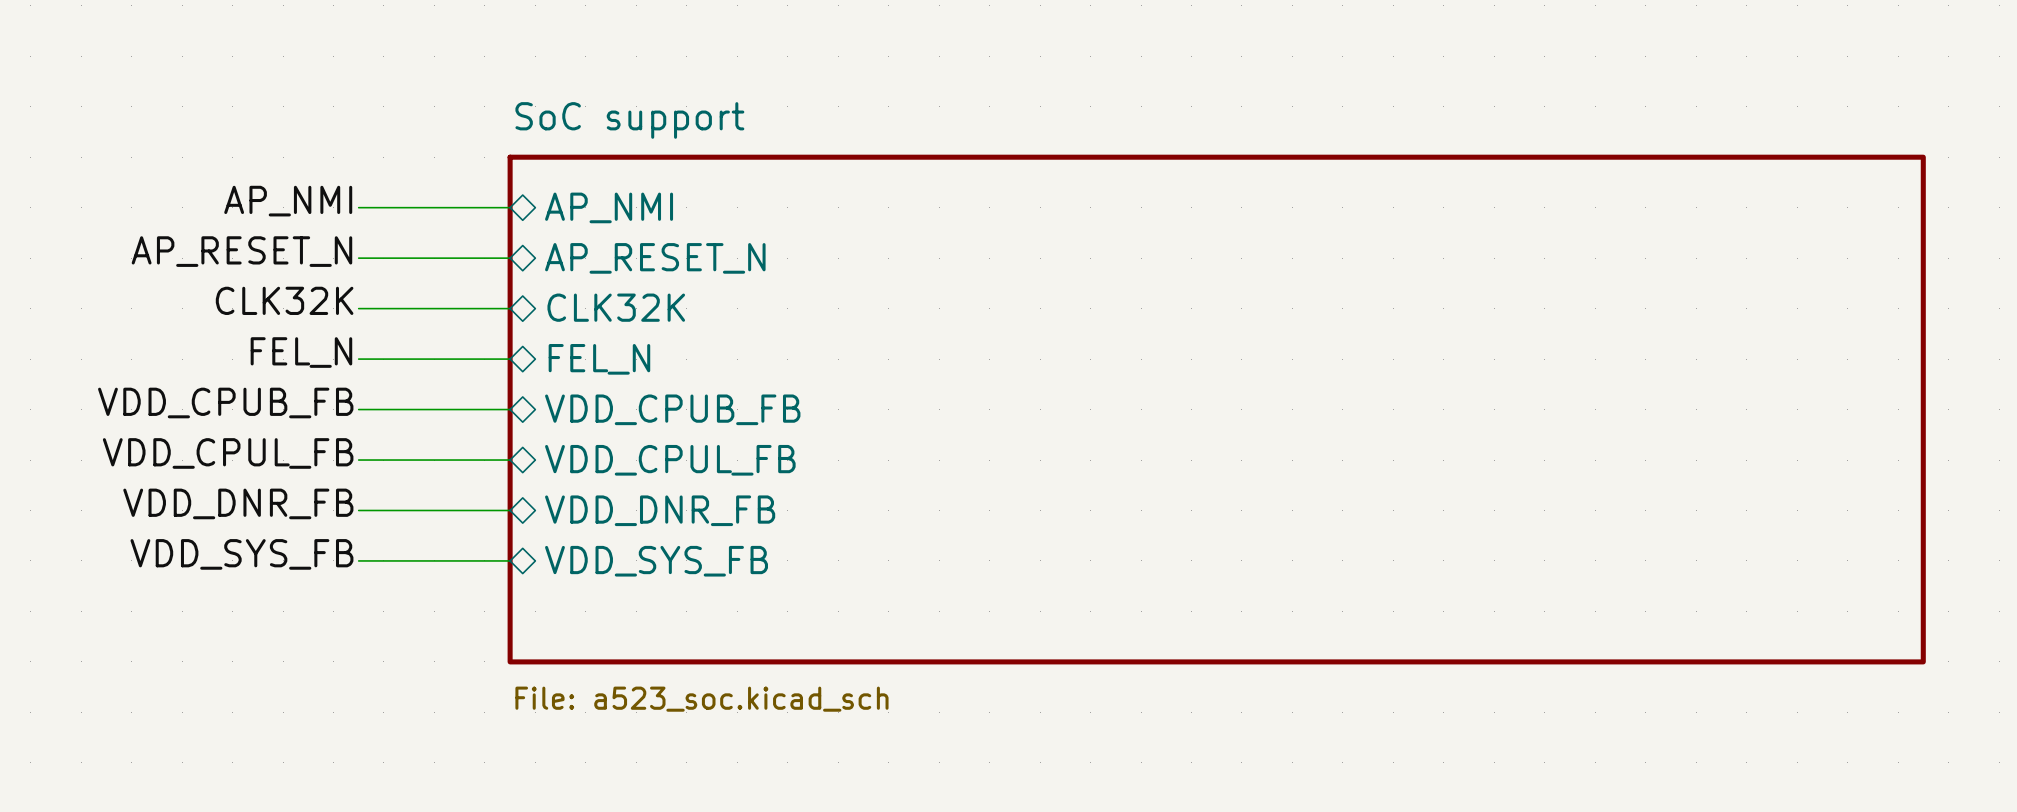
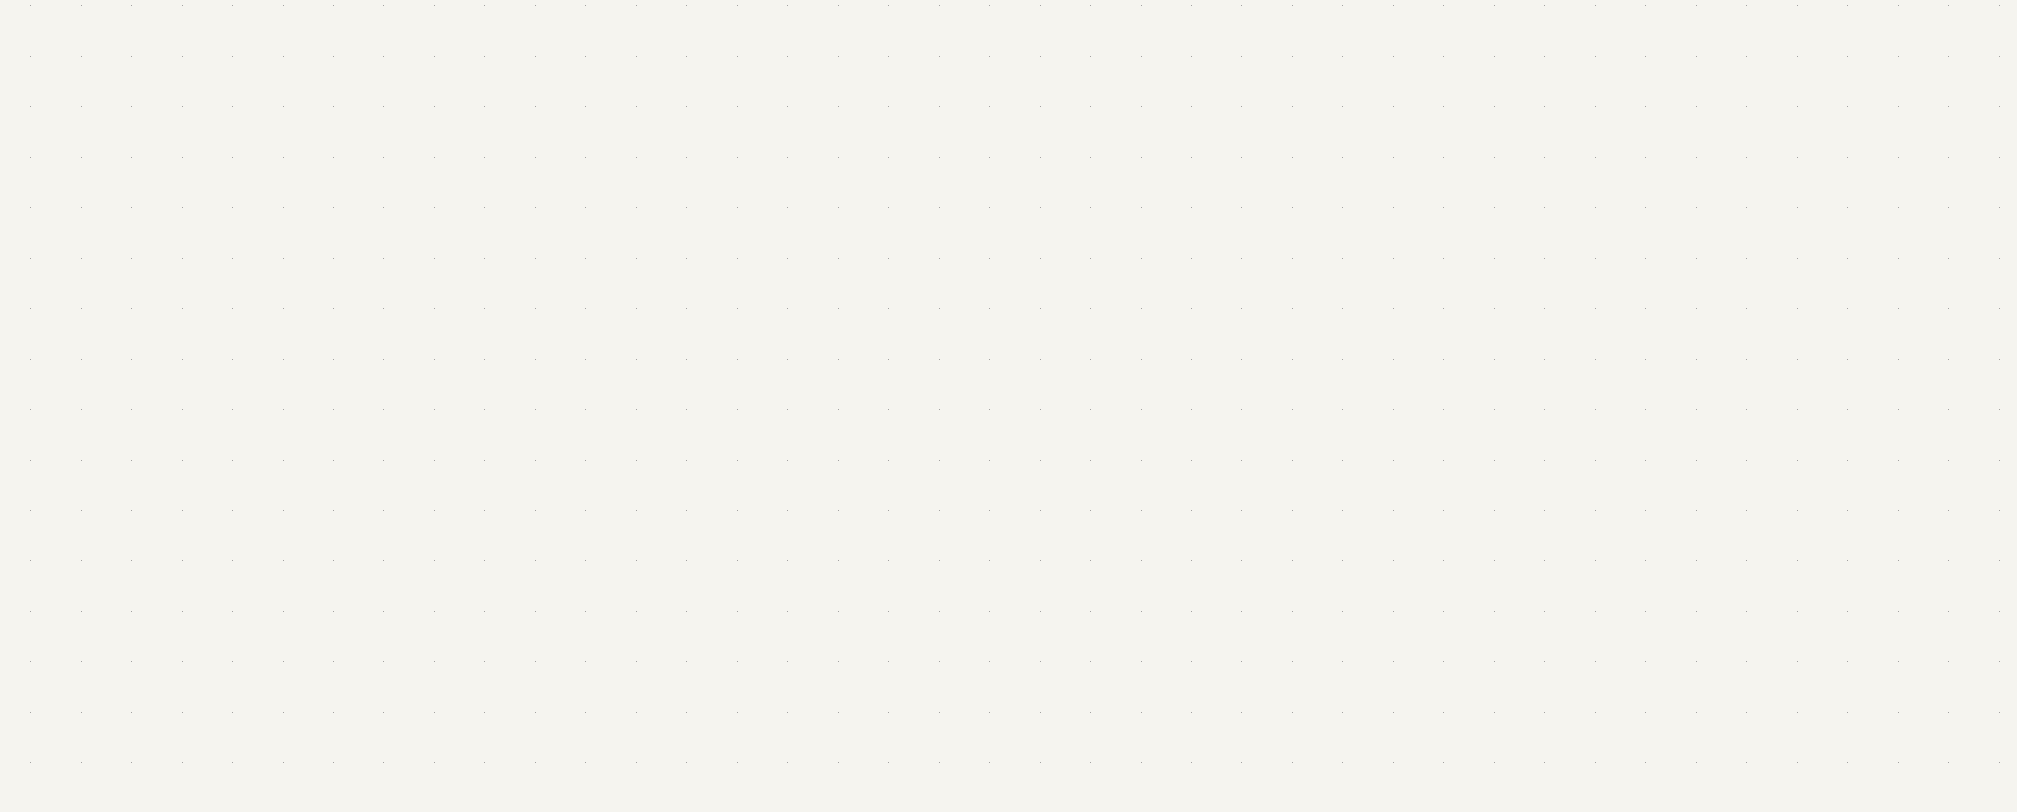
label: AP_NMI (288, 201) -> none
wire: (358, 207) (510, 207) -> none
sheet pin: AP_NMI (609, 207) -> none
label: AP_RESET_N (241, 251) -> none
wire: (358, 258) (510, 258) -> none
sheet pin: AP_RESET_N (655, 258) -> none
label: CLK32K (284, 300) -> none
sheet pin: CLK32K (616, 307) -> none
wire: (358, 308) (510, 308) -> none
label: FEL_N (301, 352) -> none
wire: (358, 359) (510, 359) -> none
sheet pin: FEL_N (599, 359) -> none
label: VDD_CPUB_FB (225, 402) -> none
wire: (358, 409) (510, 409) -> none
sheet pin: VDD_CPUB_FB (672, 409) -> none
sheet SoC support: File: a523_soc.kicad_sch (1216, 409) -> none
label: VDD_CPUL_FB (228, 453) -> none
wire: (358, 460) (510, 460) -> none
sheet pin: VDD_CPUL_FB (670, 460) -> none
label: VDD_DNR_FB (238, 503) -> none
wire: (358, 510) (510, 510) -> none
sheet pin: VDD_DNR_FB (660, 510) -> none
label: VDD_SYS_FB (241, 554) -> none
wire: (358, 560) (510, 560) -> none
sheet pin: VDD_SYS_FB (656, 561) -> none

